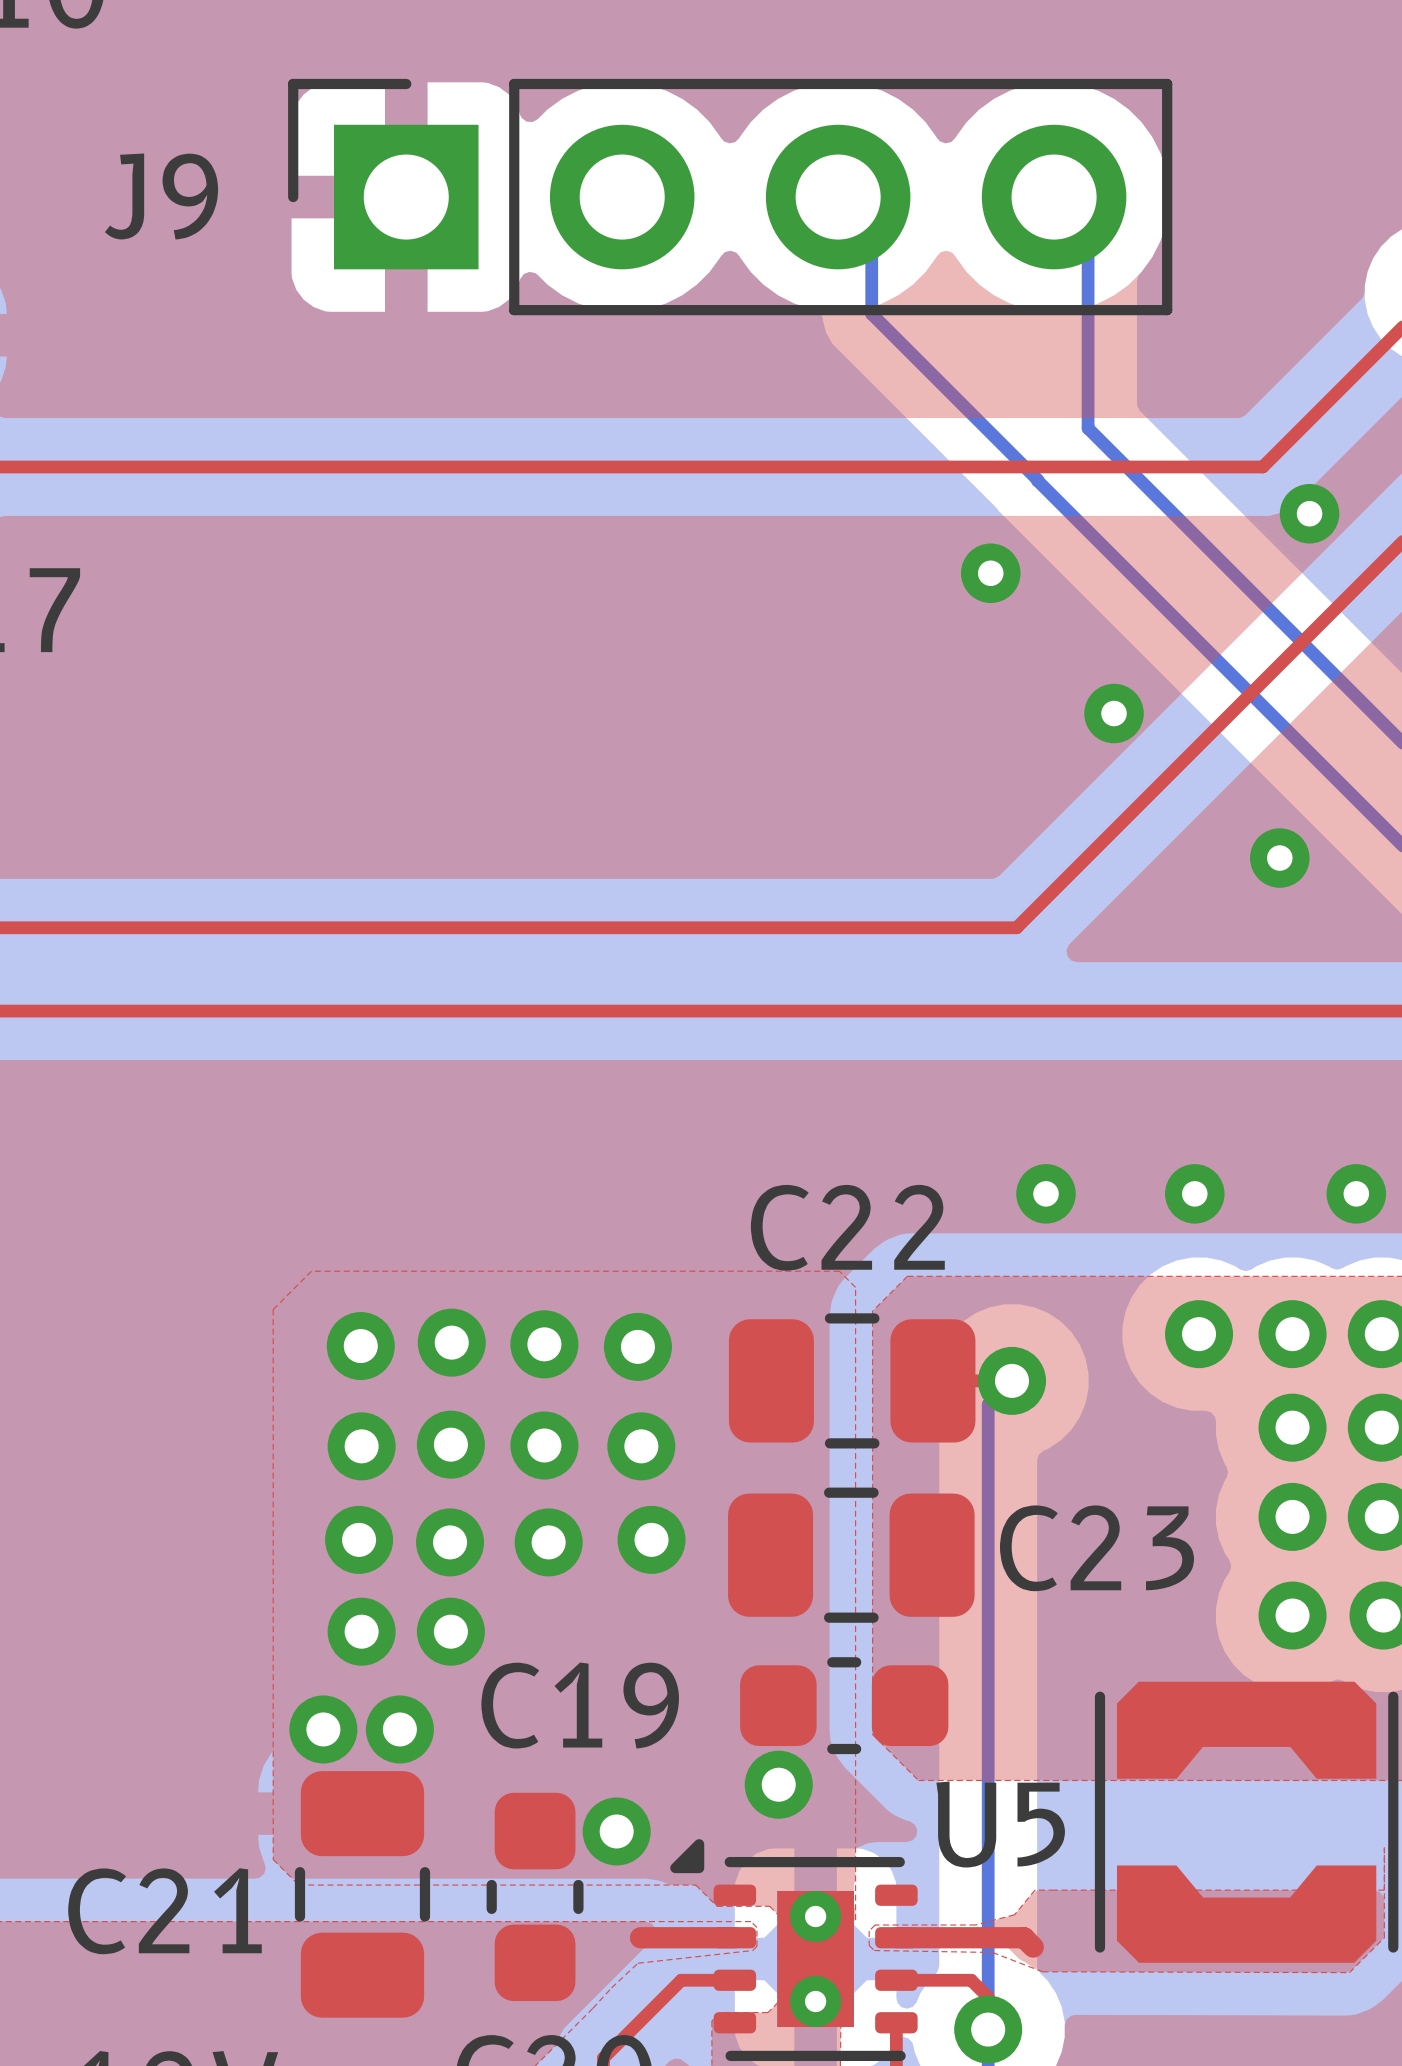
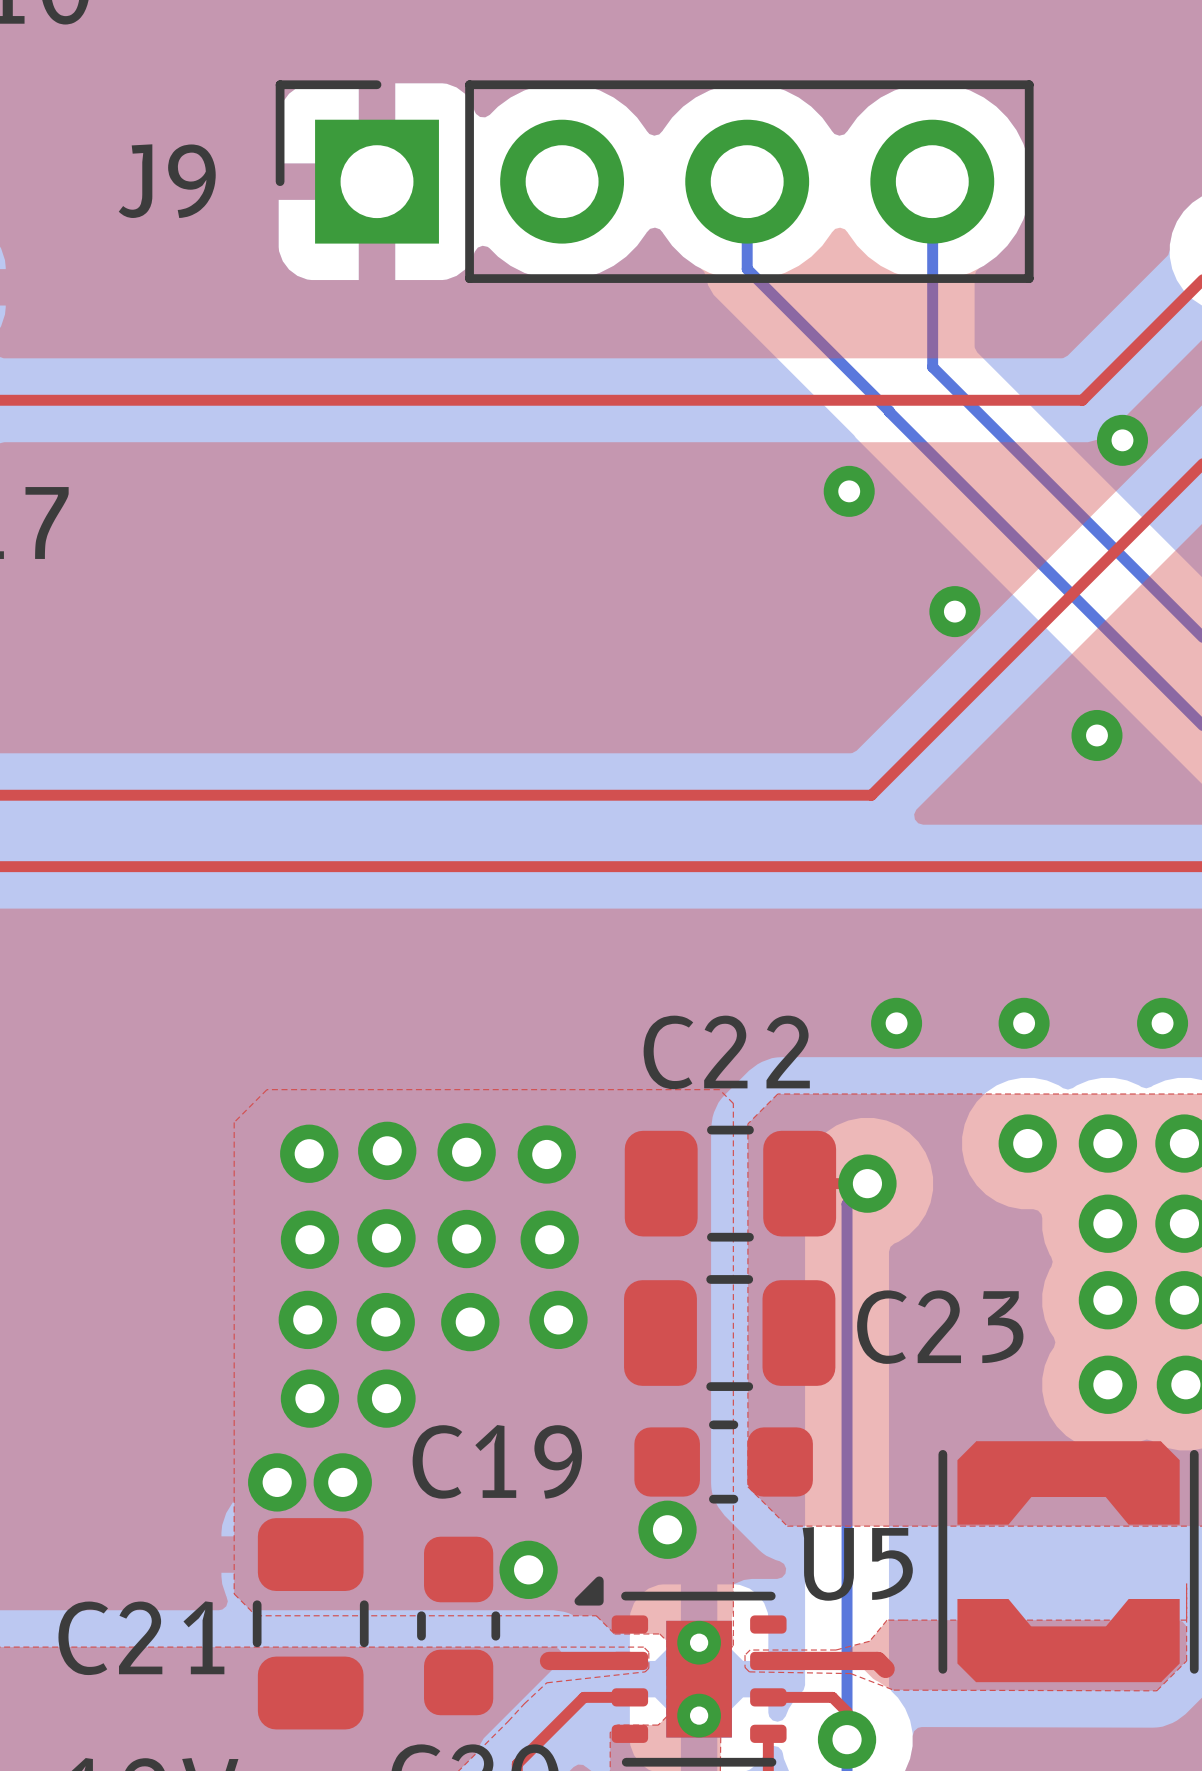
J9 position: (730, 197) -> (654, 181)

